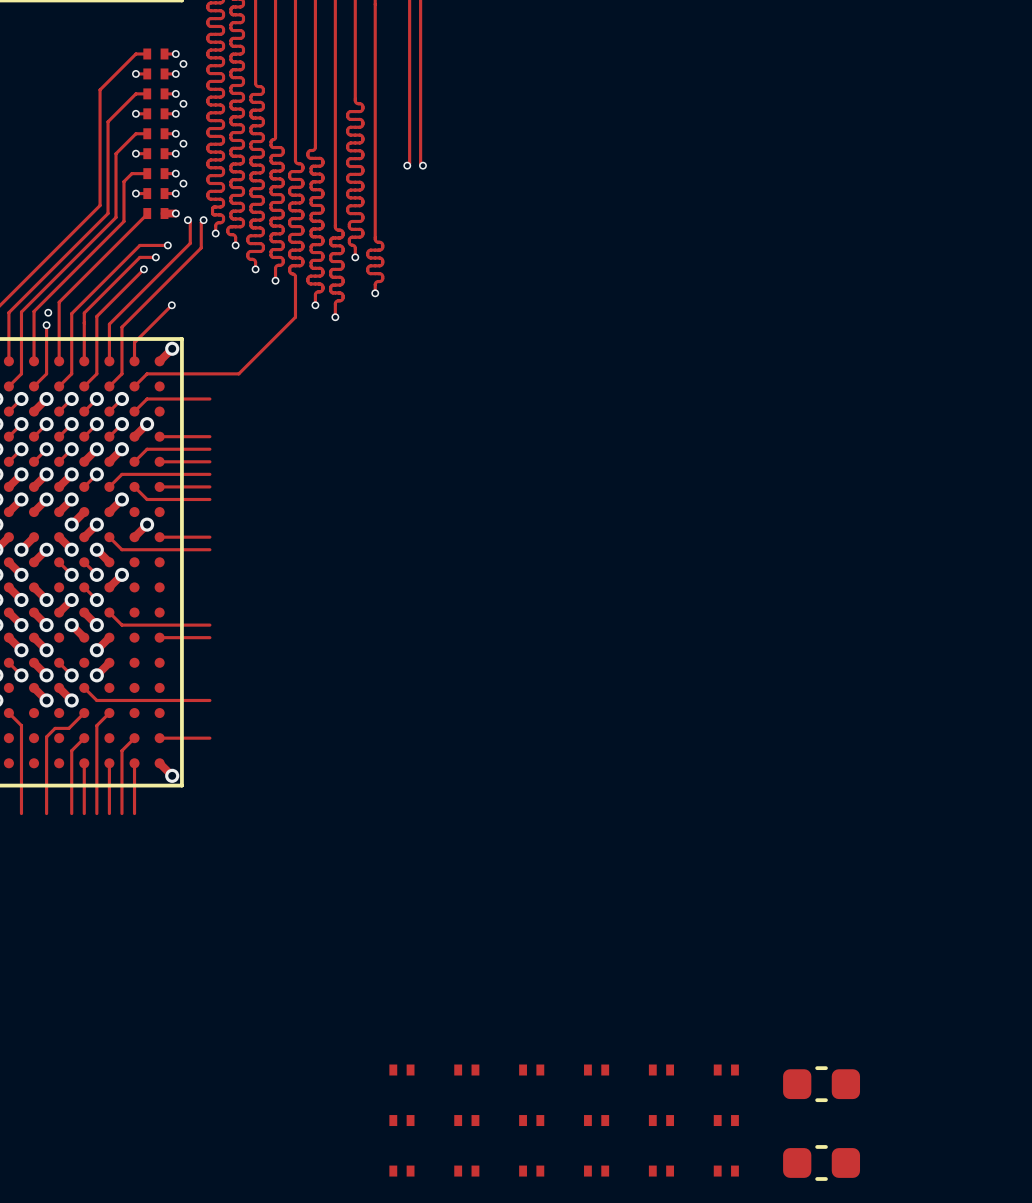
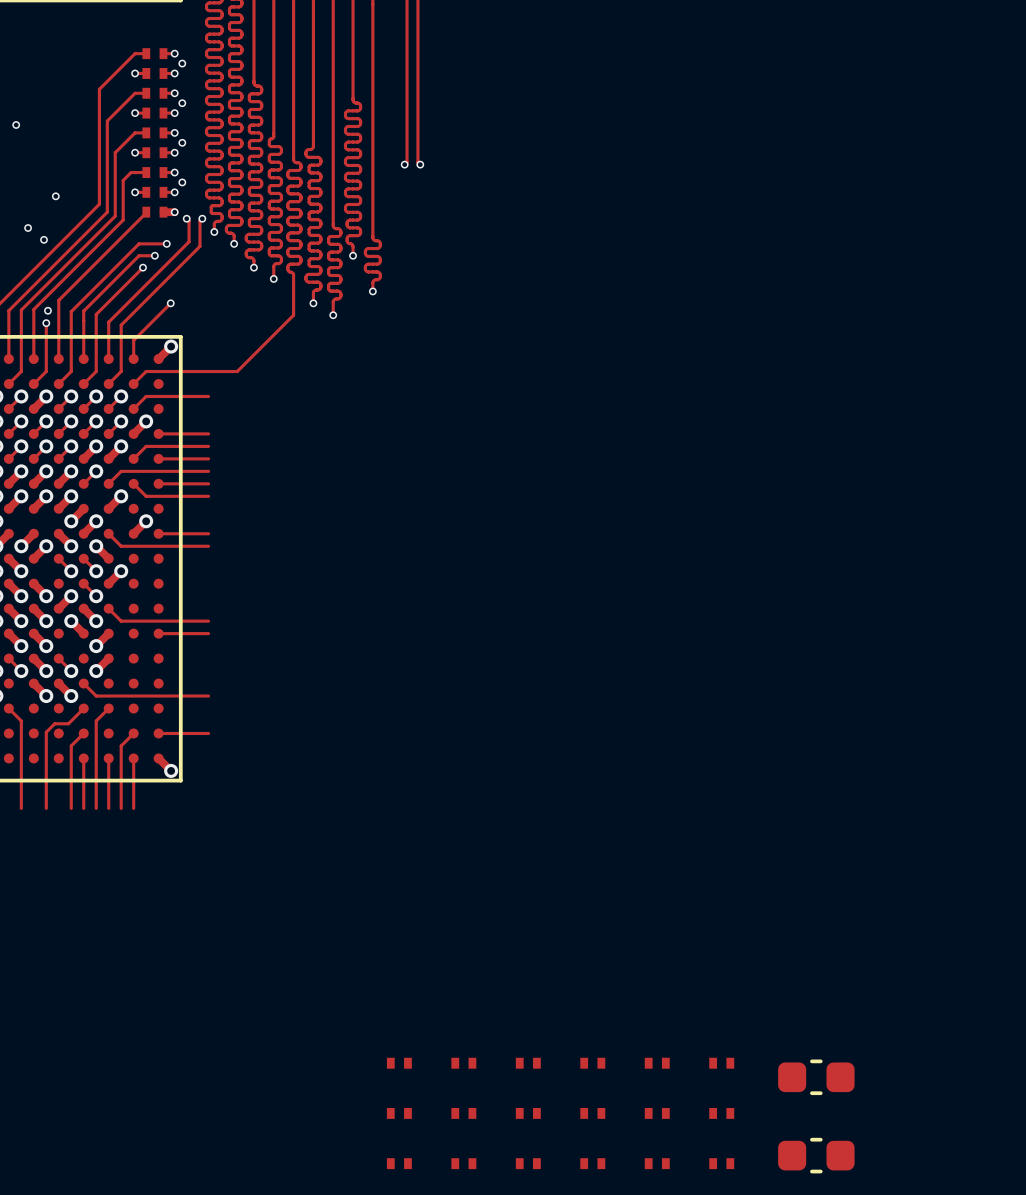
via: none -> (16, 124)
via: none -> (55, 196)
via: none -> (28, 228)
via: none -> (43, 239)

